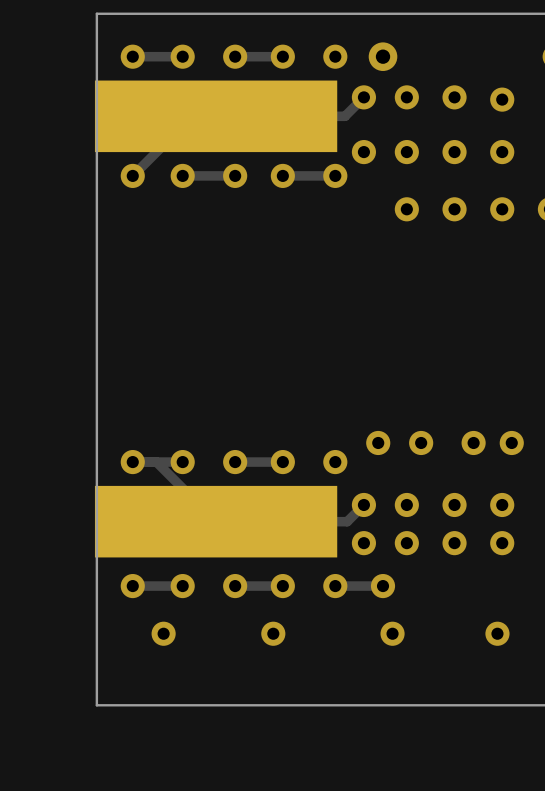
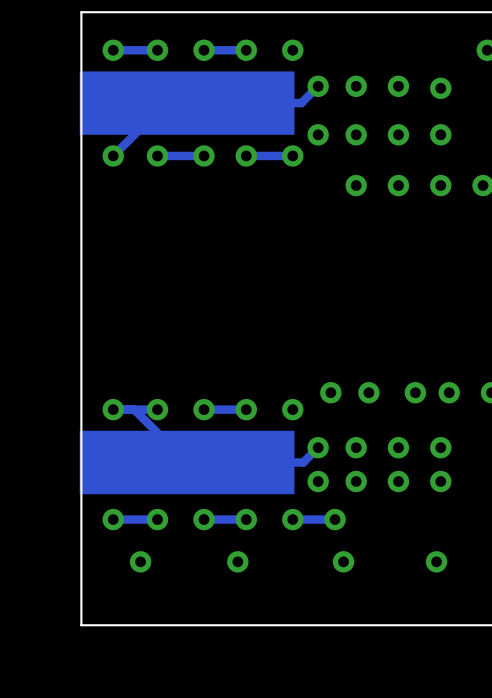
via: (383, 56) -> none

